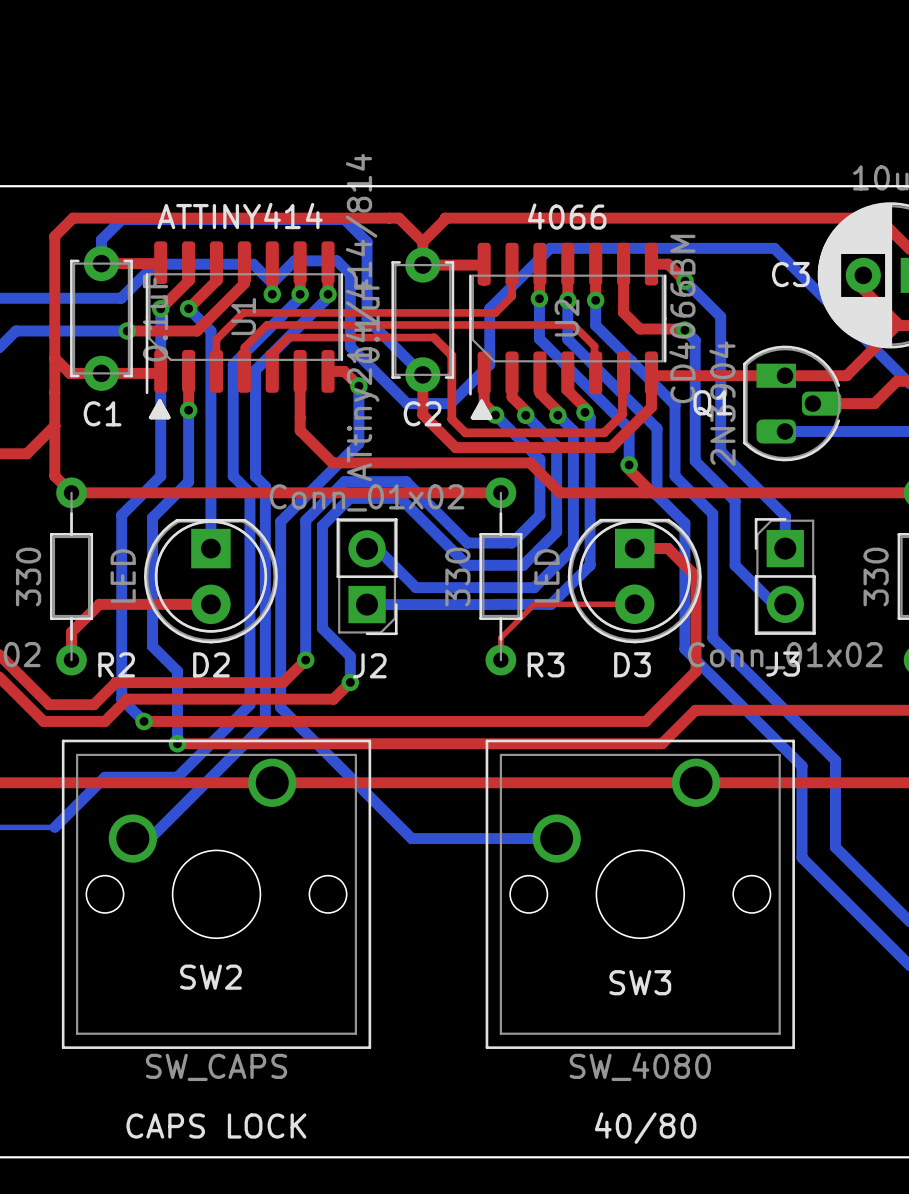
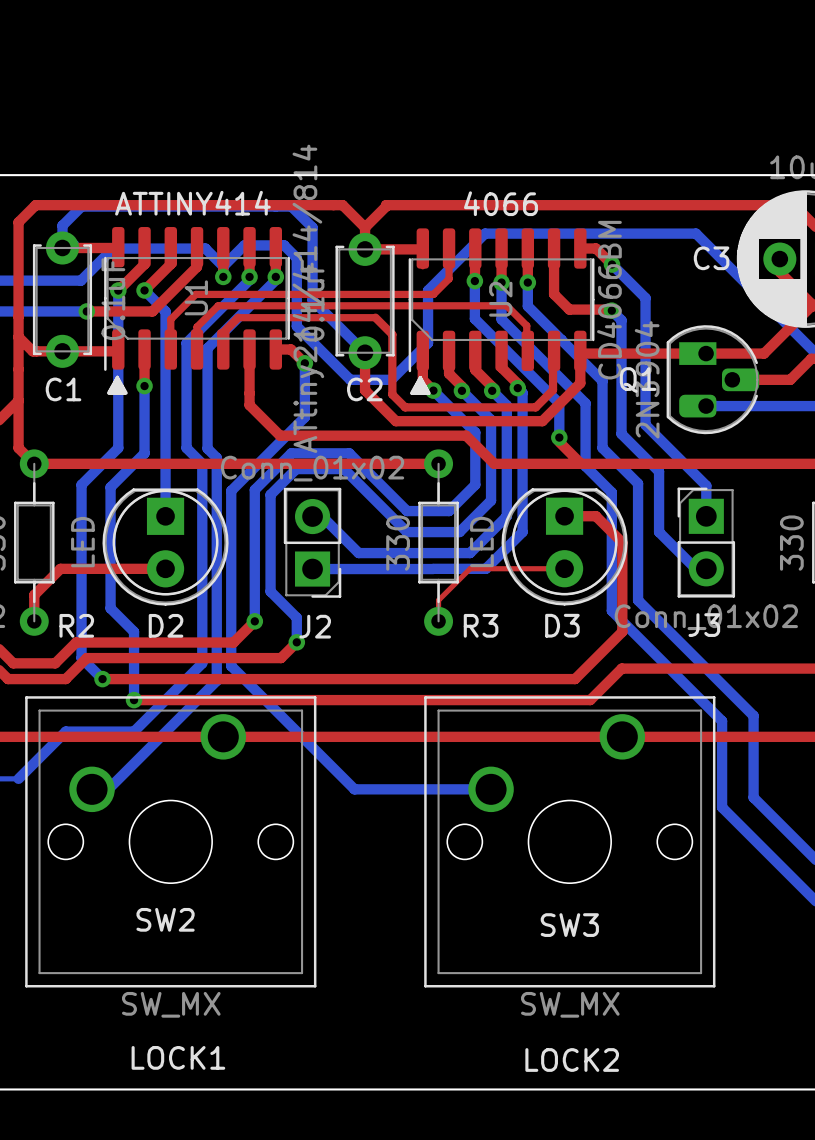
SW3 value: SW_4080 (640, 1066) -> SW_MX (570, 1004)
SW2 value: SW_CAPS (216, 1067) -> SW_MX (171, 1004)
text: none -> LOCK1 (178, 1057)
text: CAPS LOCK (216, 1126) -> none
text: 40/80 (645, 1128) -> LOCK2 (572, 1060)

